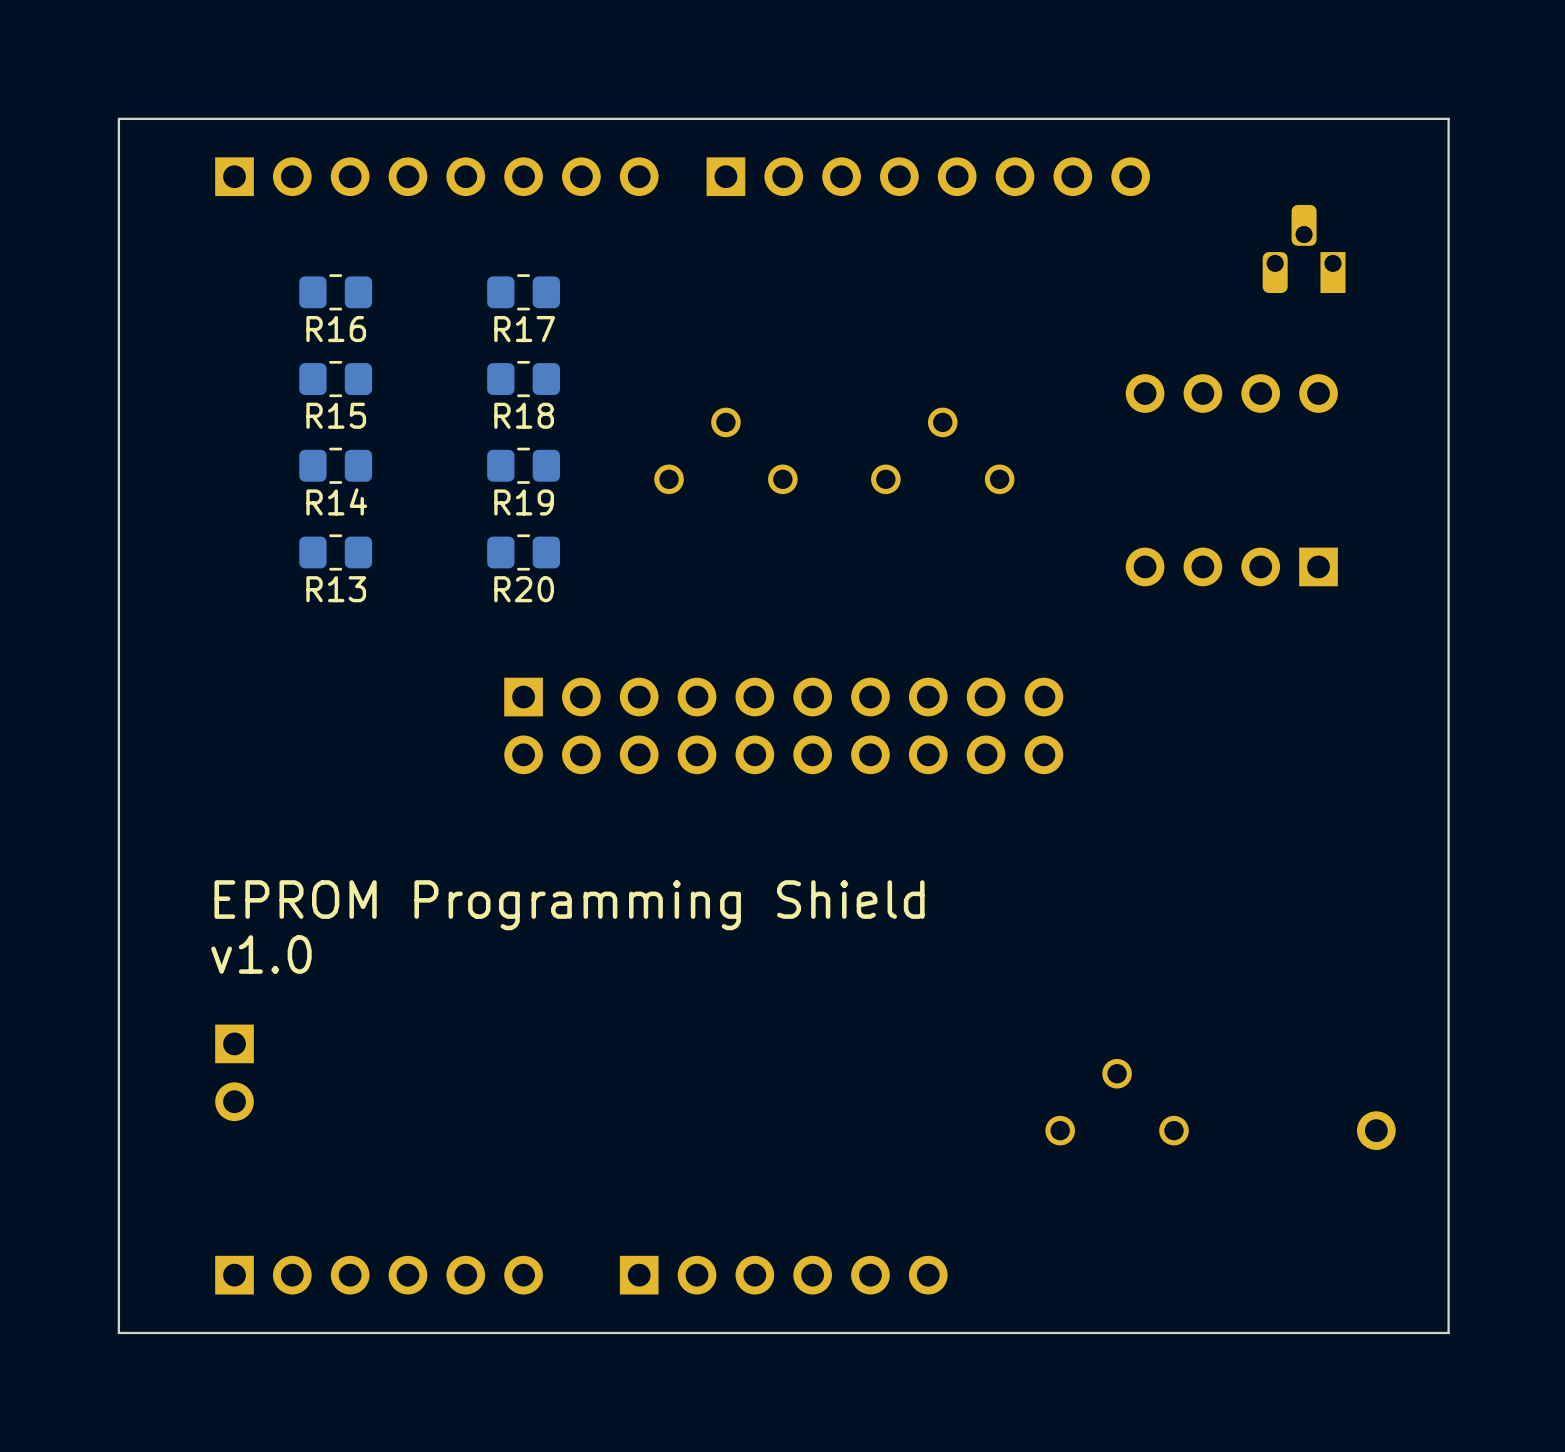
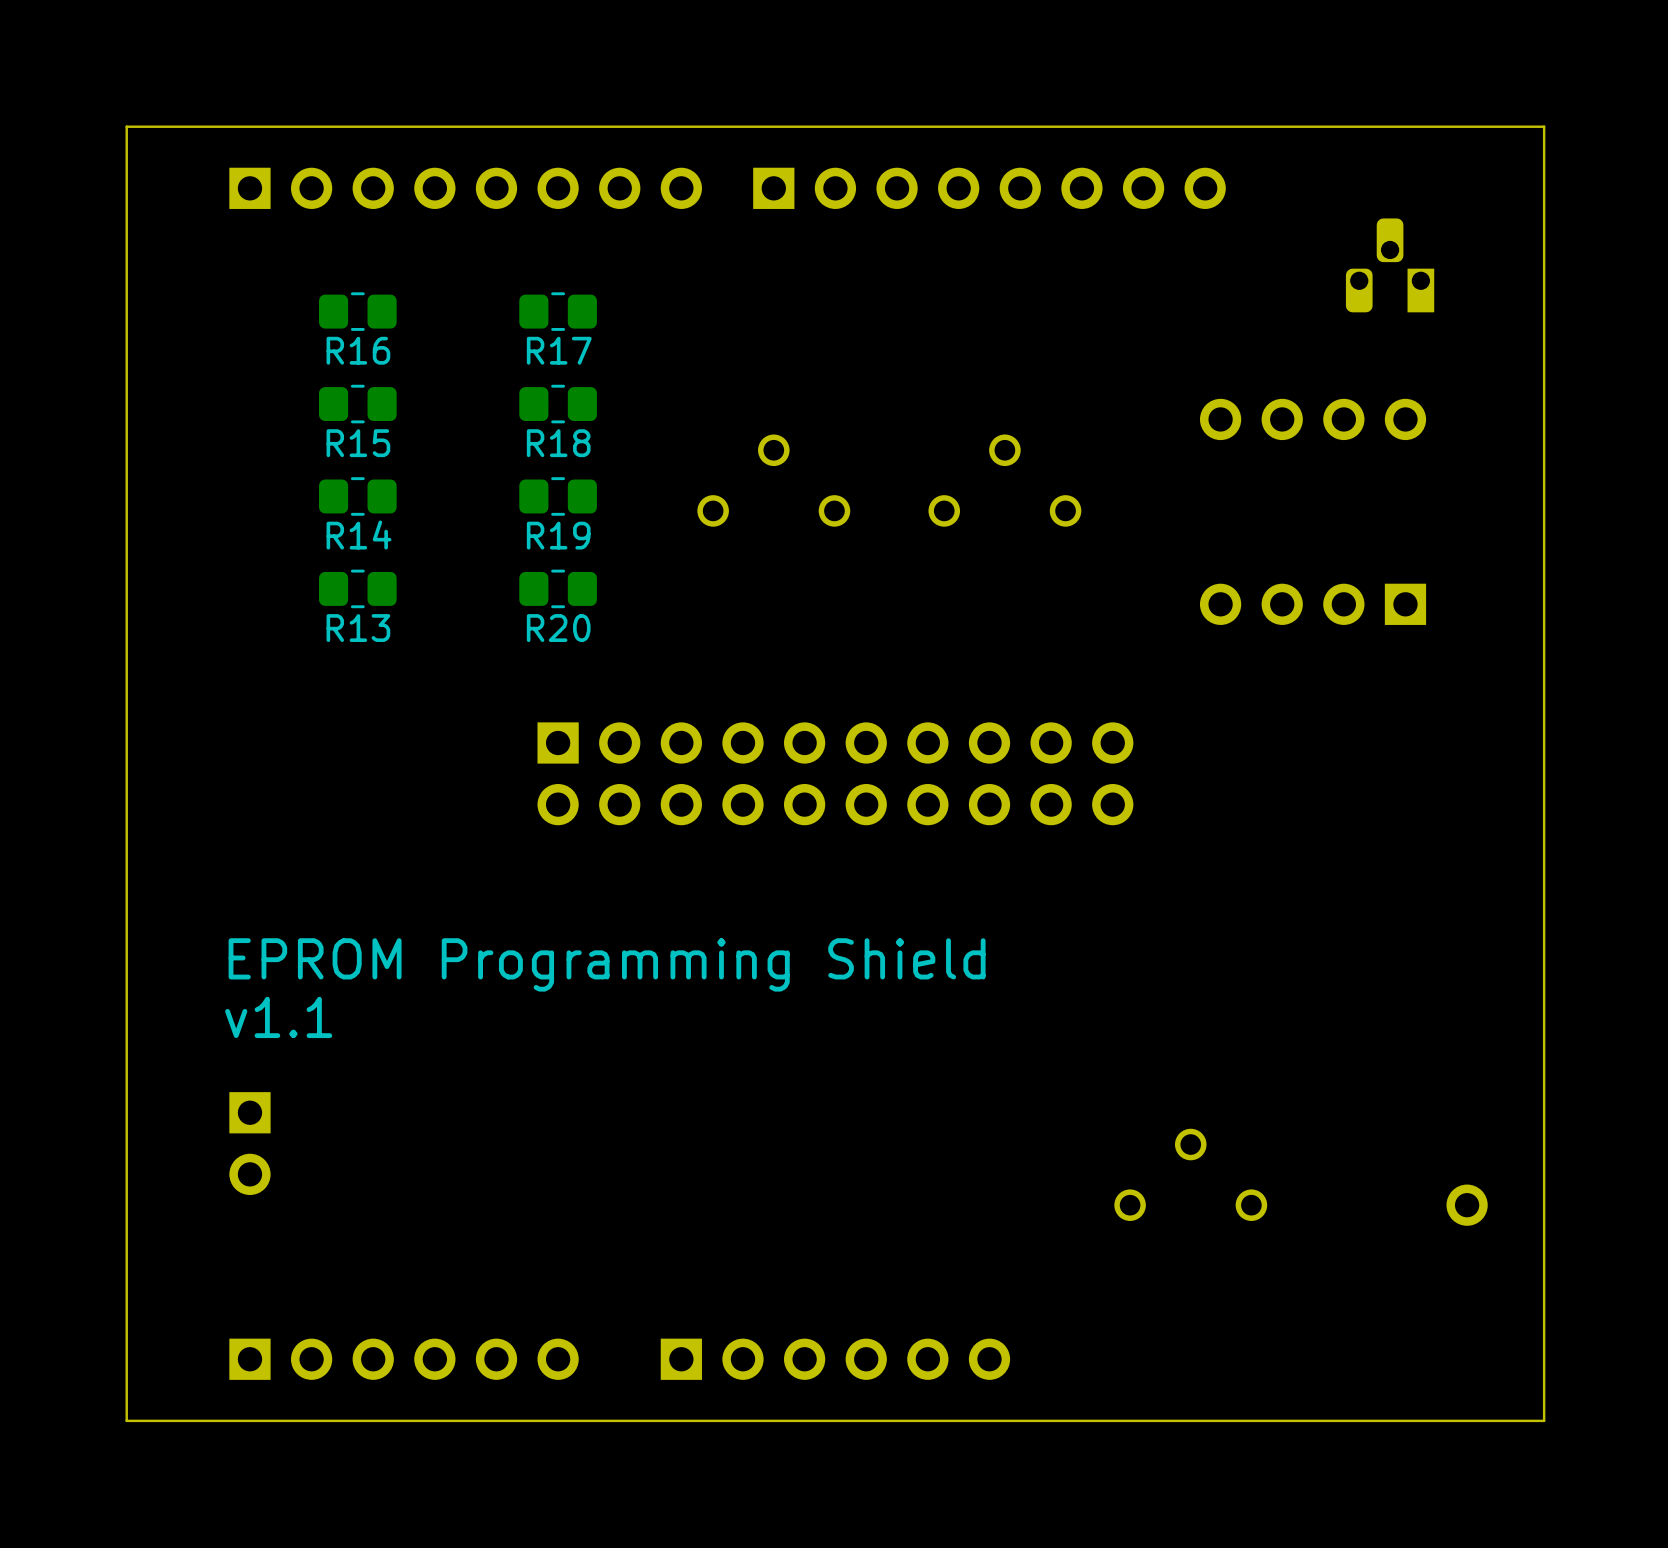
text: v1.0 (261, 954) -> v1.1 (278, 1017)

